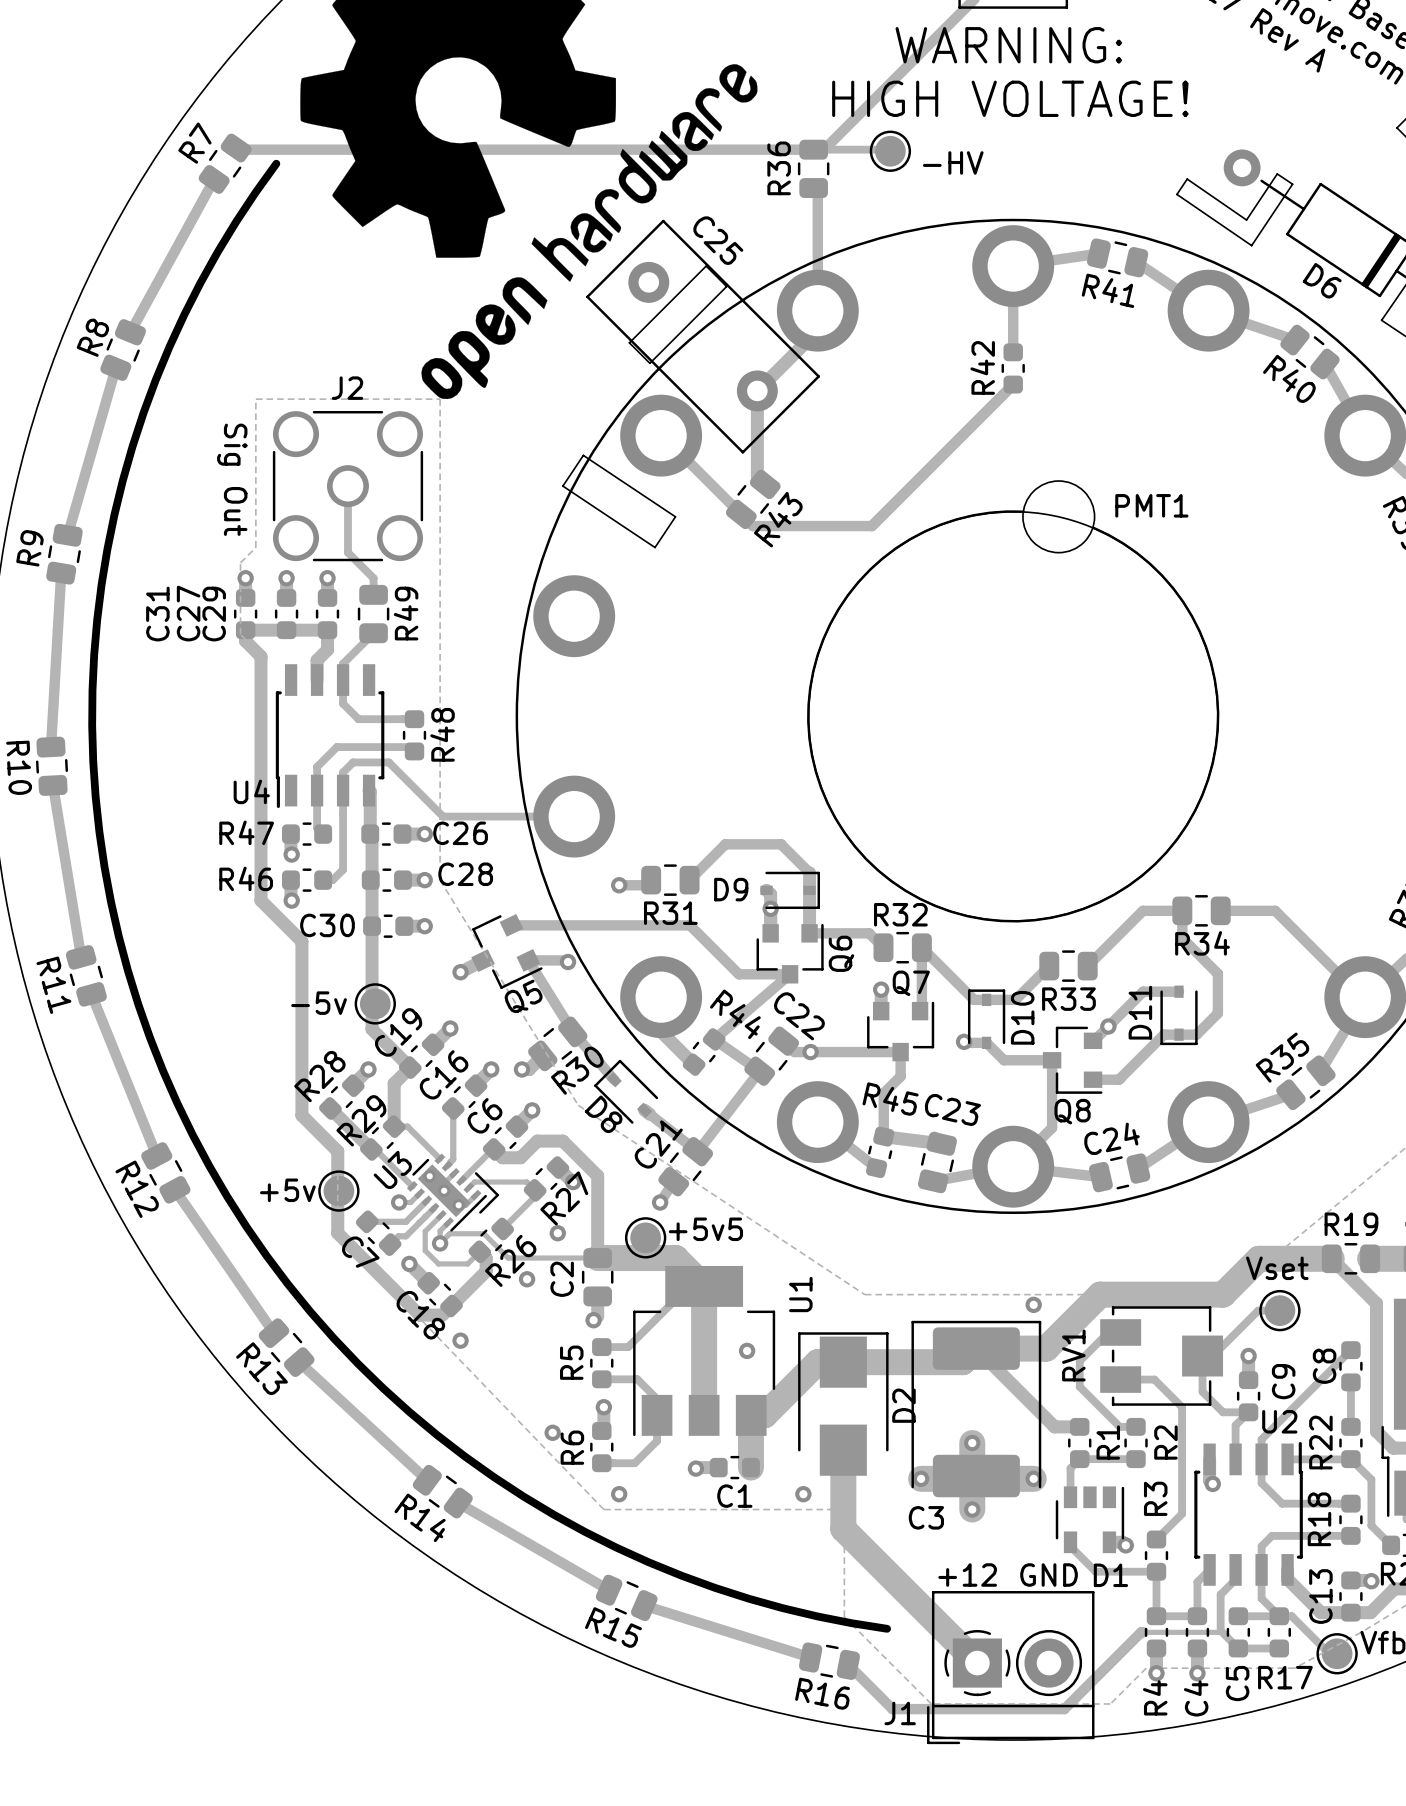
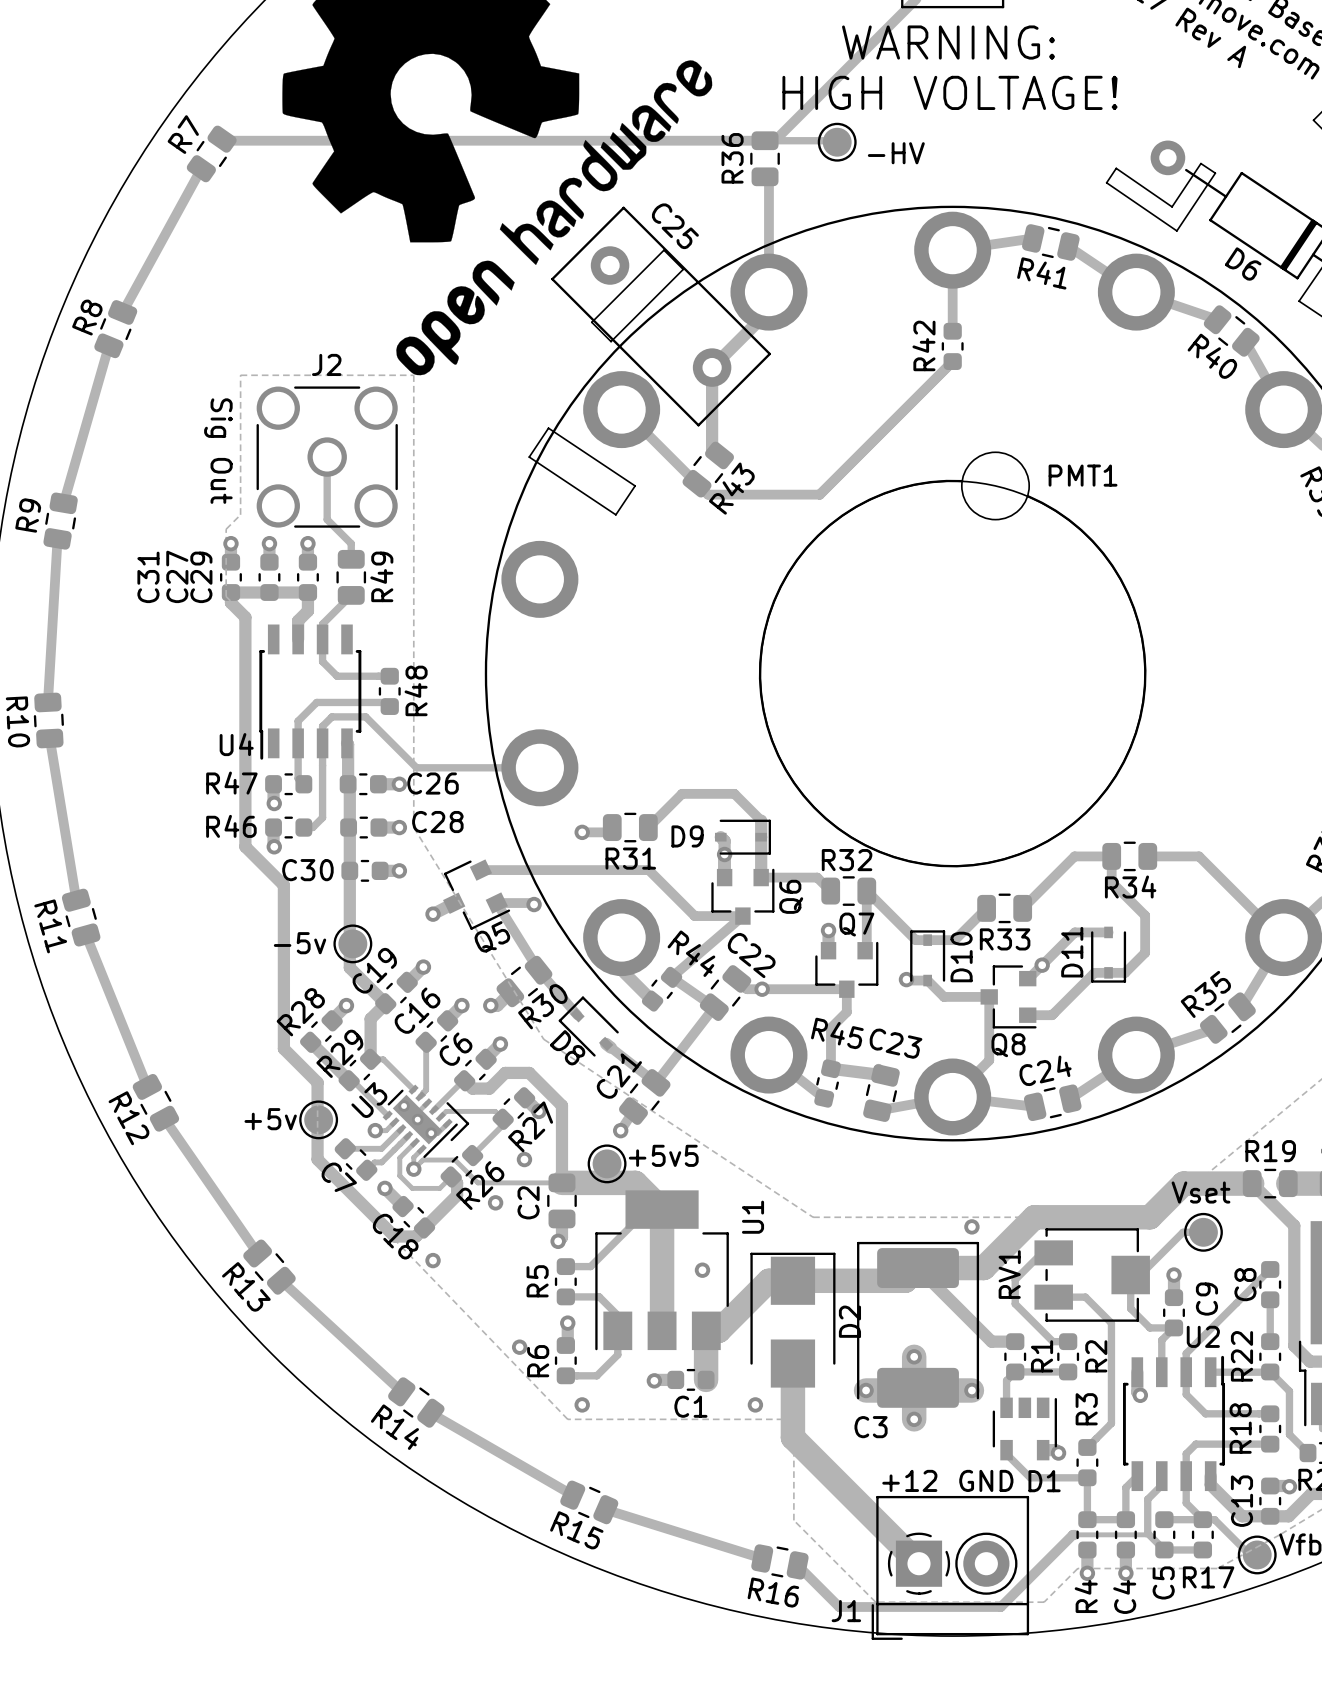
line: (276, 163) (217, 252) (169, 346) (132, 446) (114, 515) (101, 584) (92, 690) (93, 761) (99, 831) (110, 901) (127, 970) (163, 1070) (209, 1166) (246, 1226) (287, 1284) (358, 1363) (437, 1435) (493, 1477) (553, 1514) (648, 1562) (715, 1587) (782, 1608) (887, 1628) -> none

